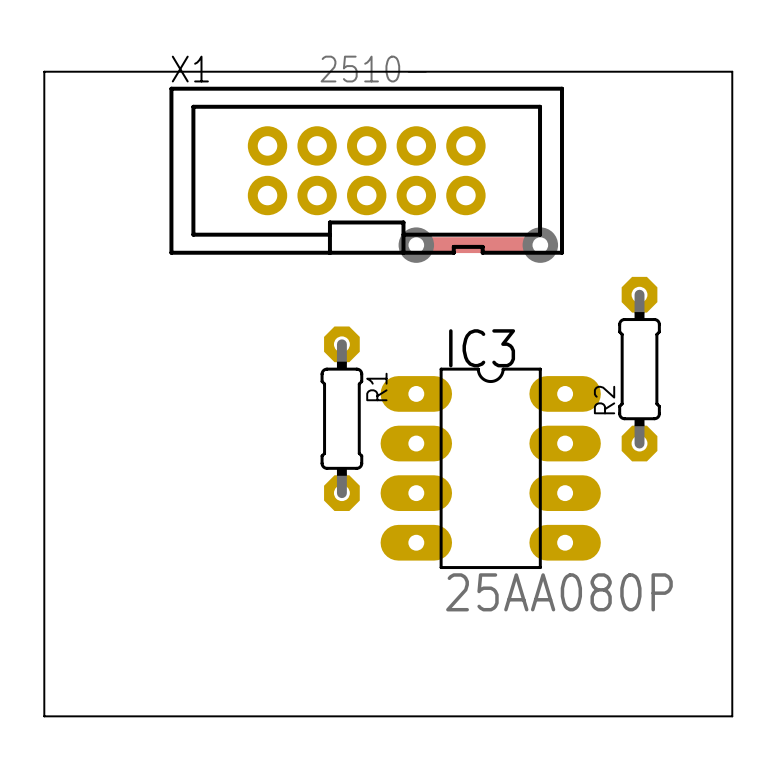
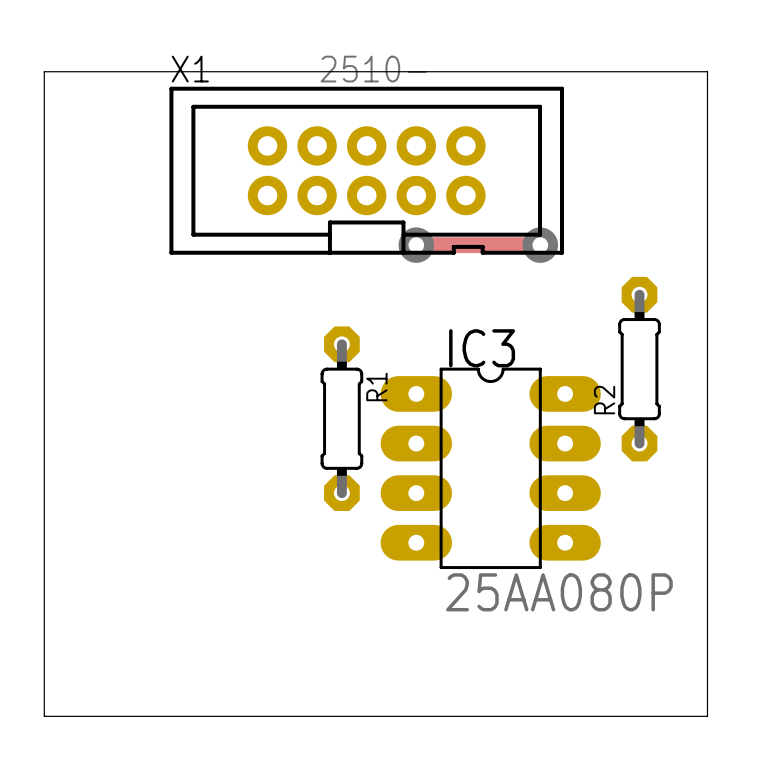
board edge: (707, 71) (732, 71) (732, 716) (707, 716) -> (707, 71) (707, 716)

